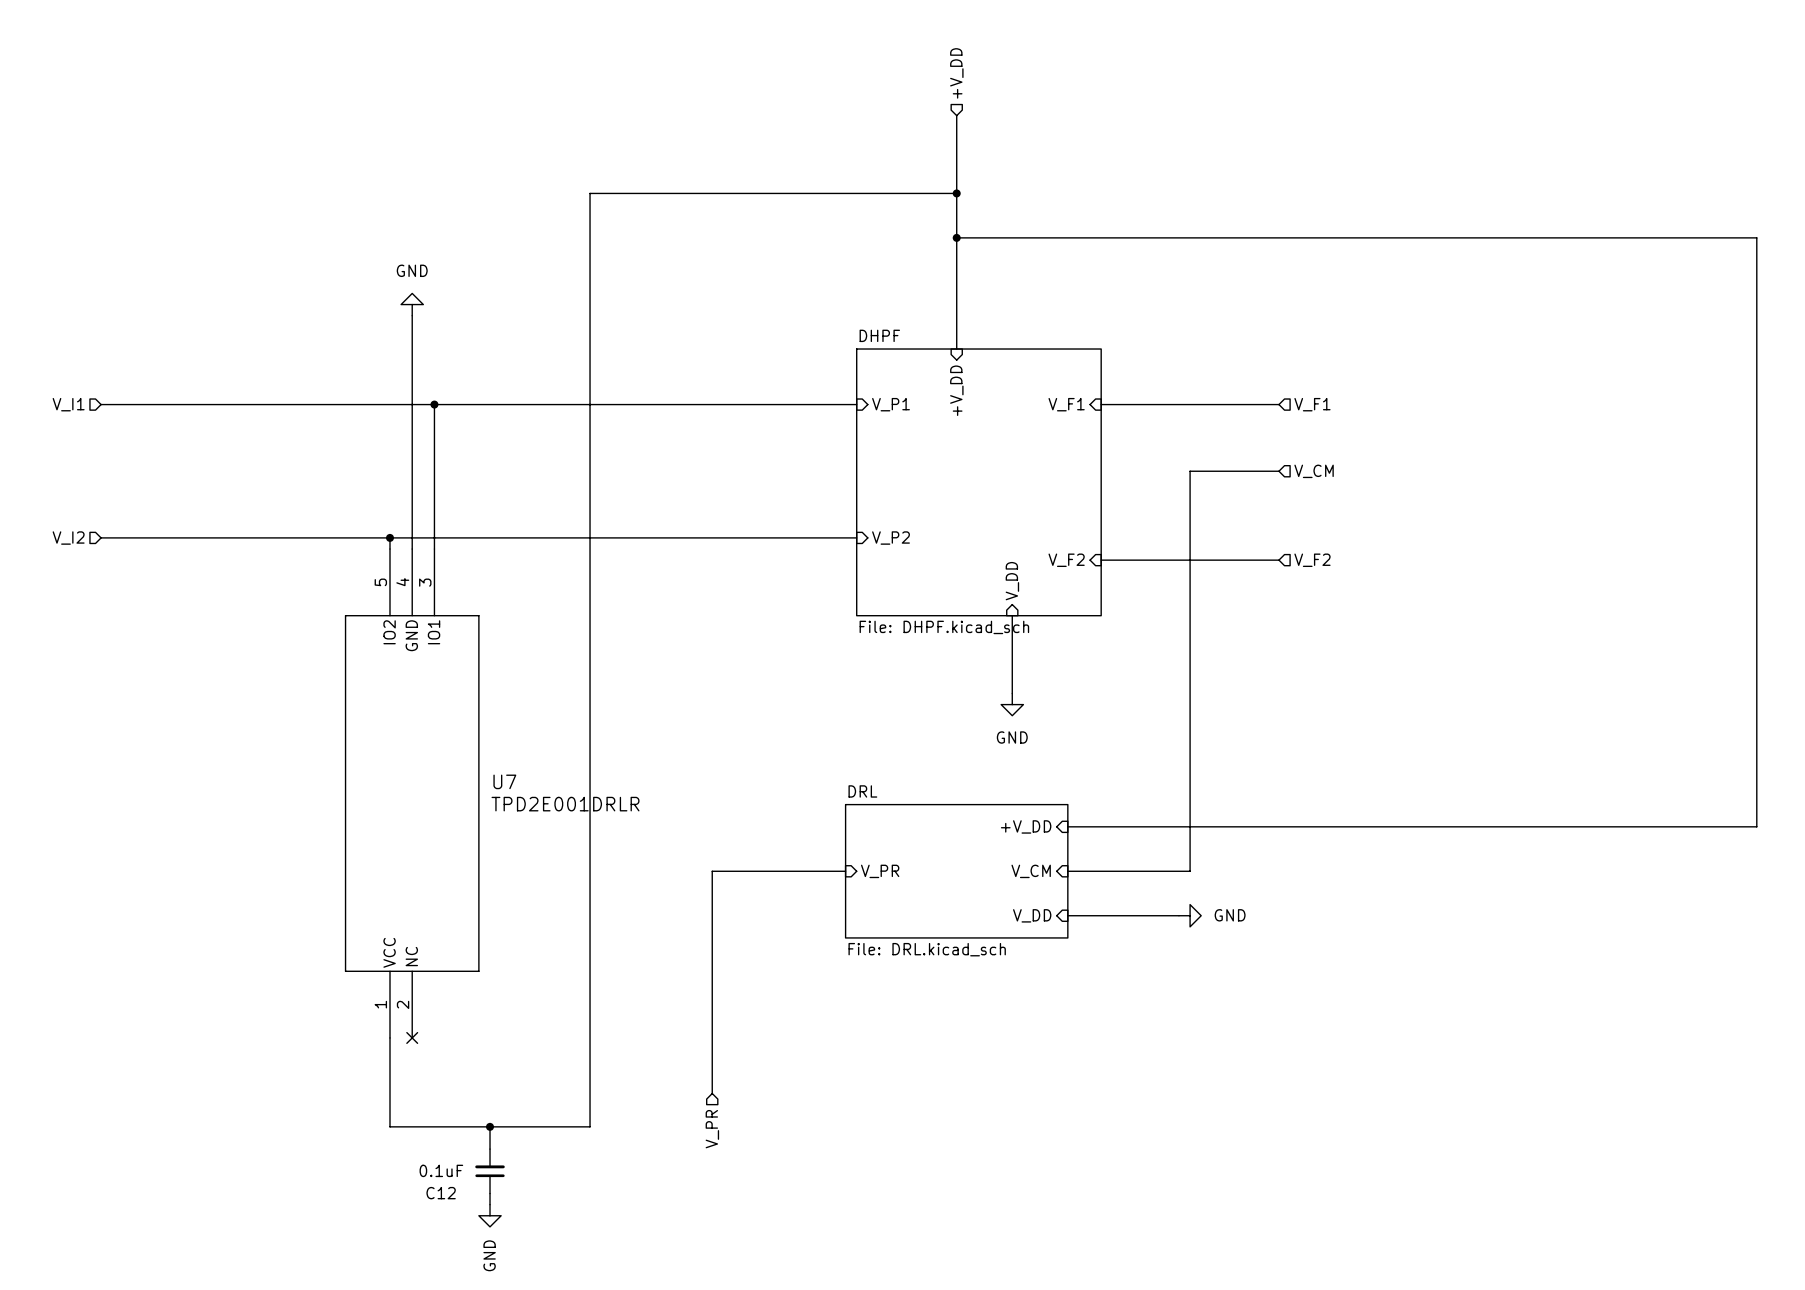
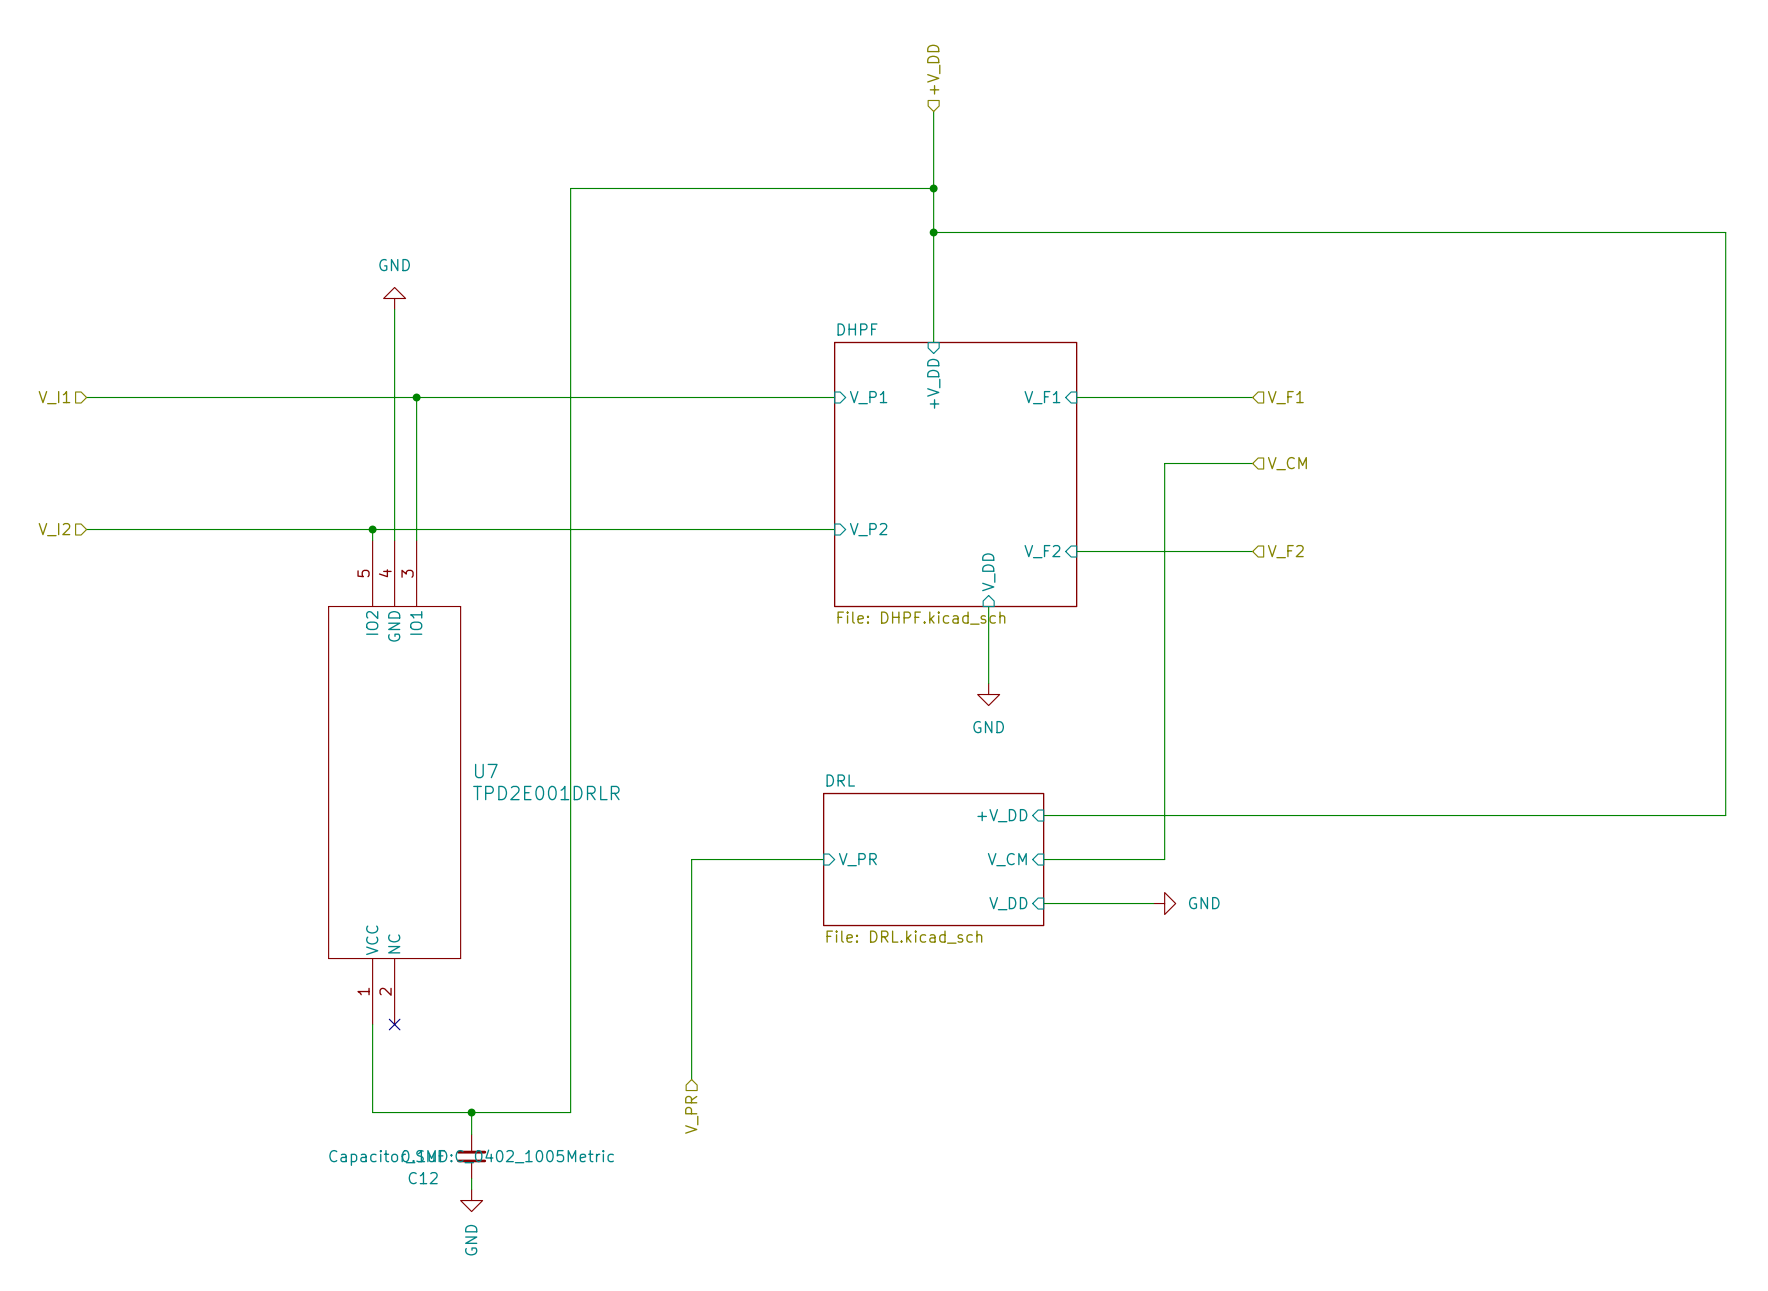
C12 text: none -> Capacitor_SMD:C_0402_1005Metric (471, 1157)

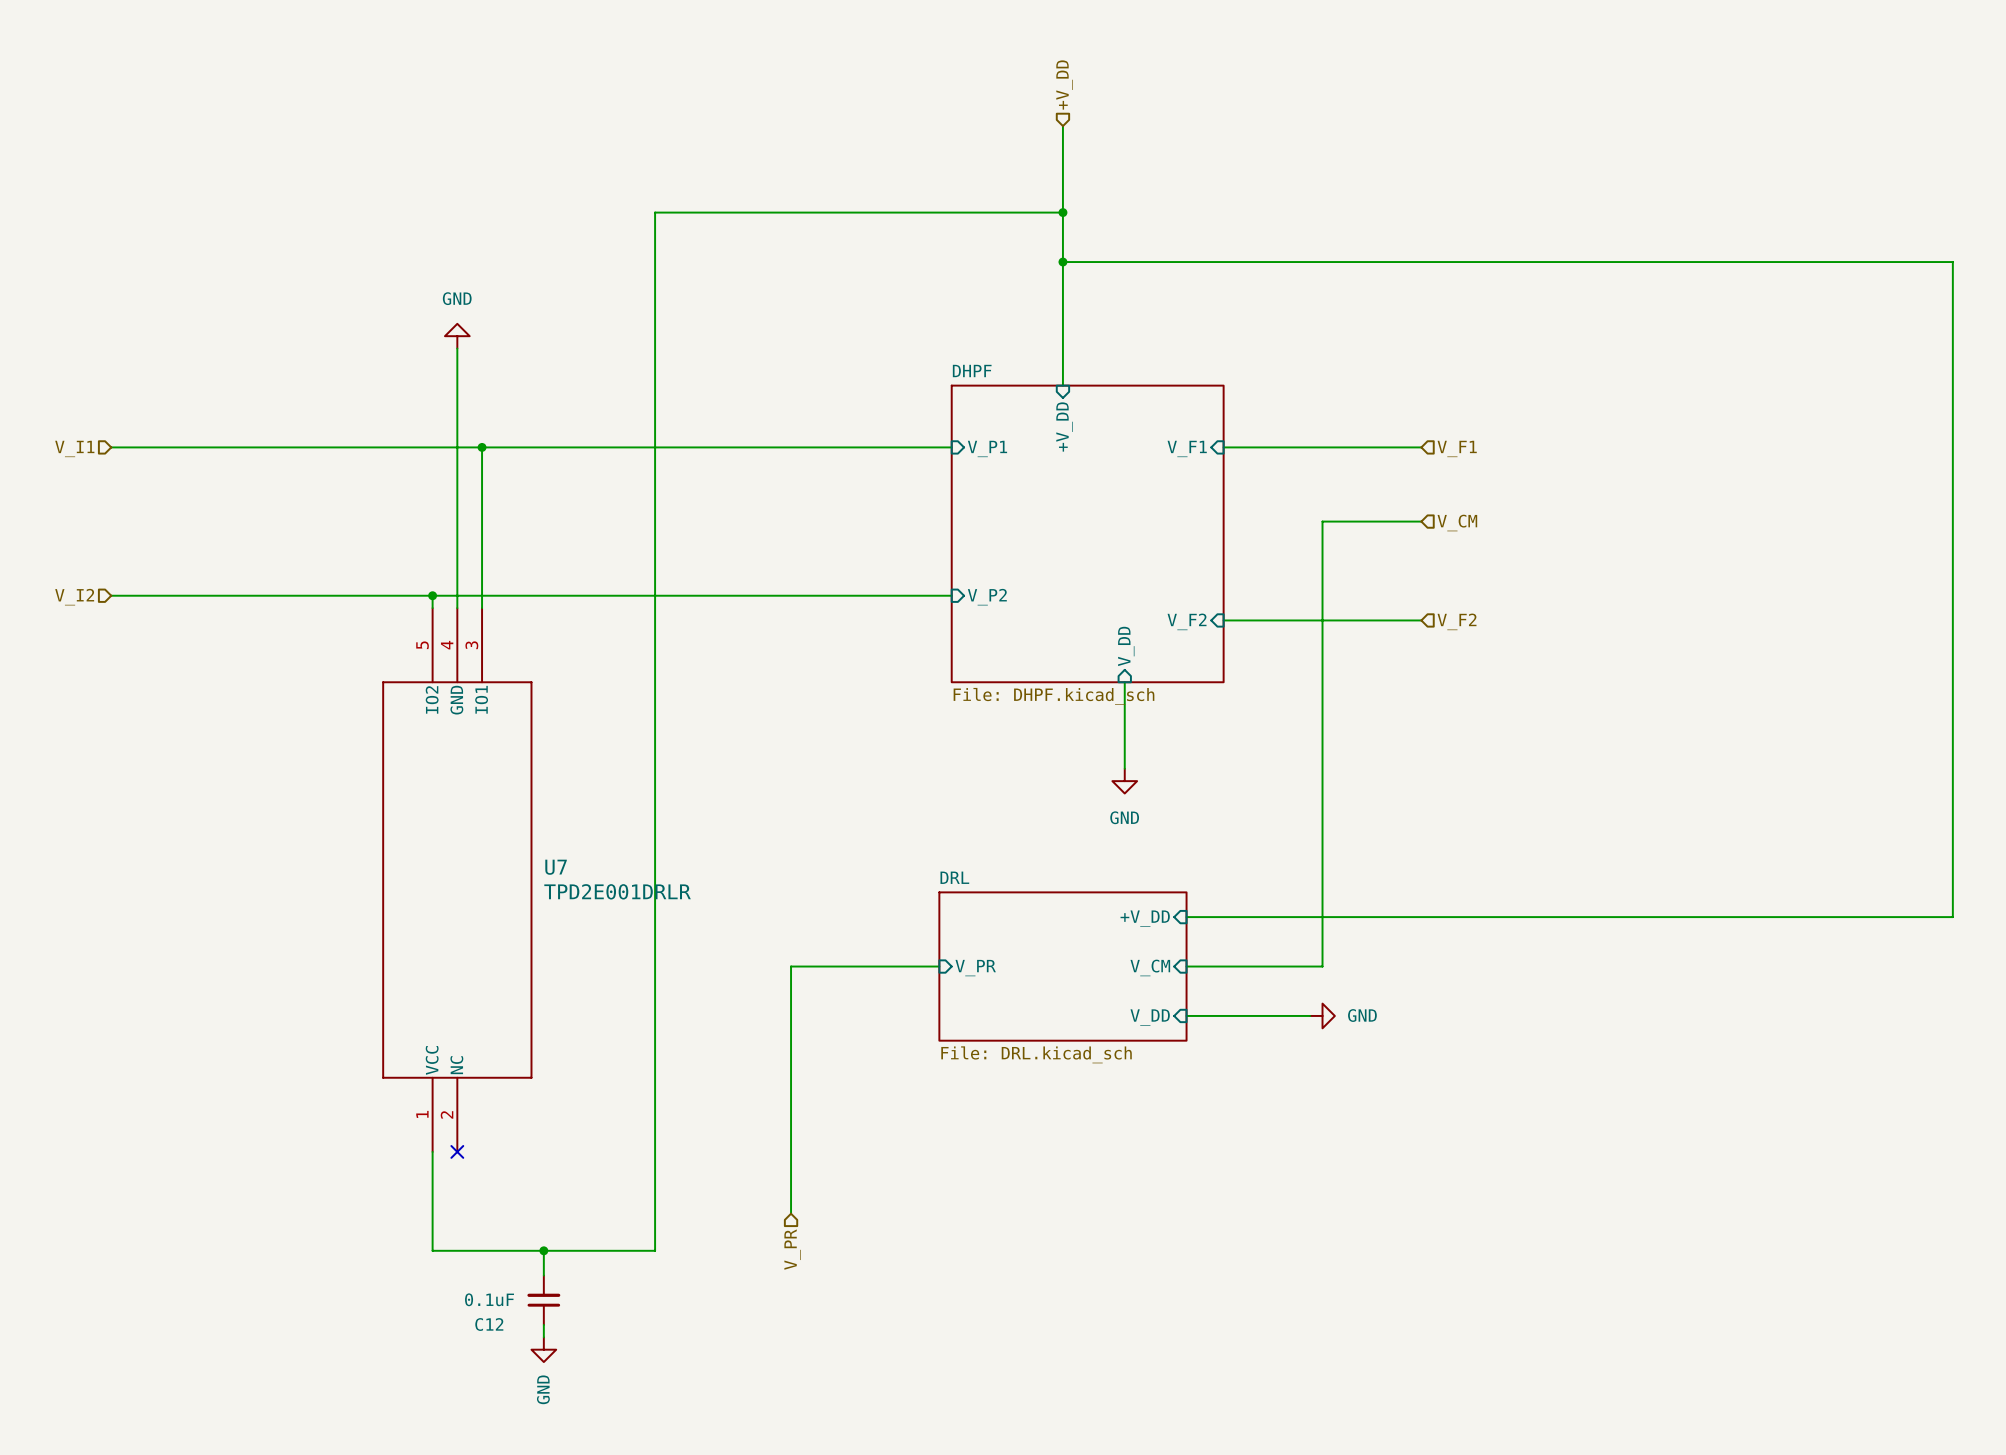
C12 text: Capacitor_SMD:C_0402_1005Metric (471, 1157) -> none

